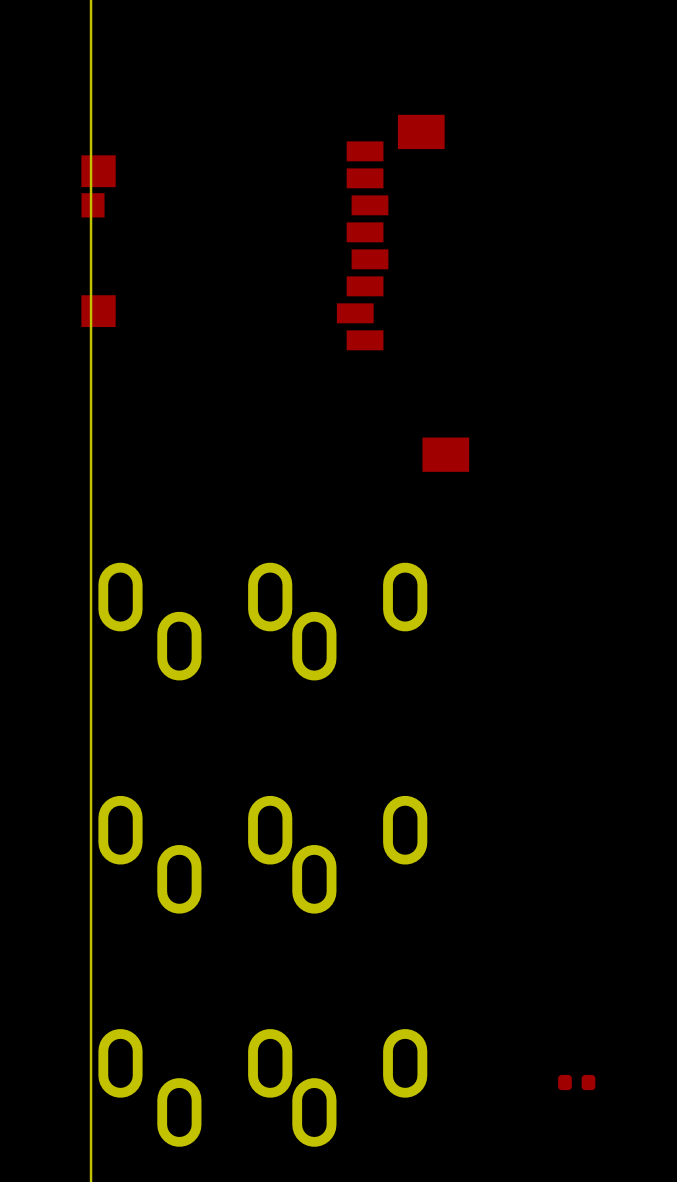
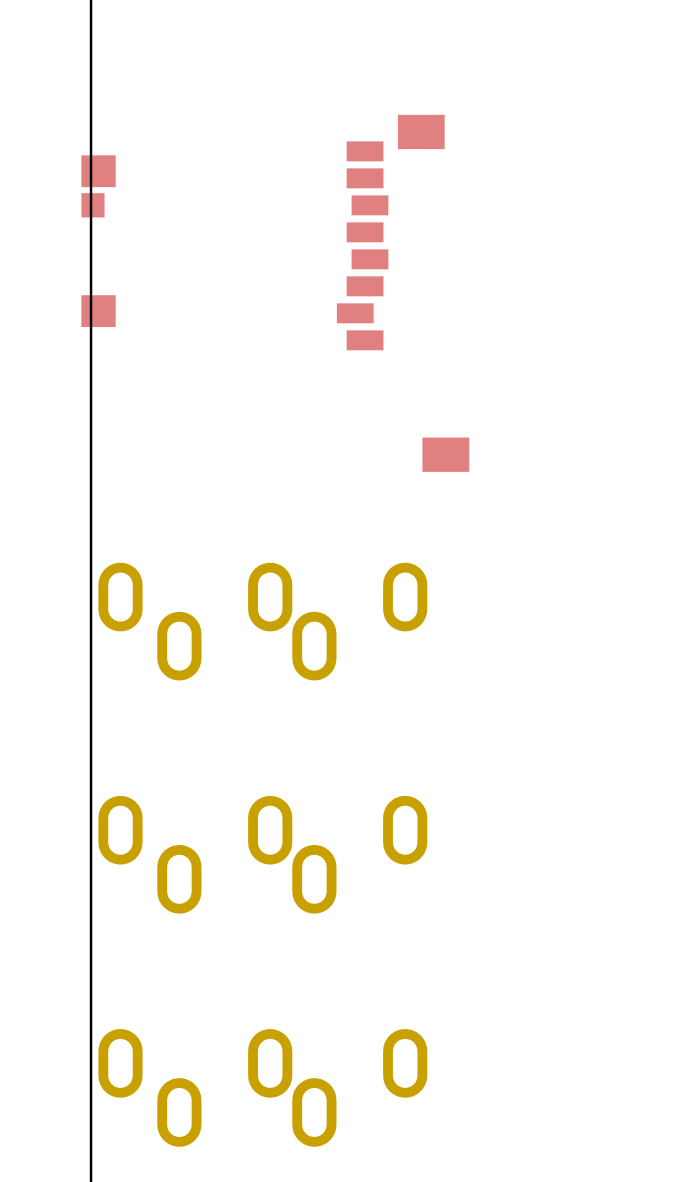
part: (576, 1082) -> none

